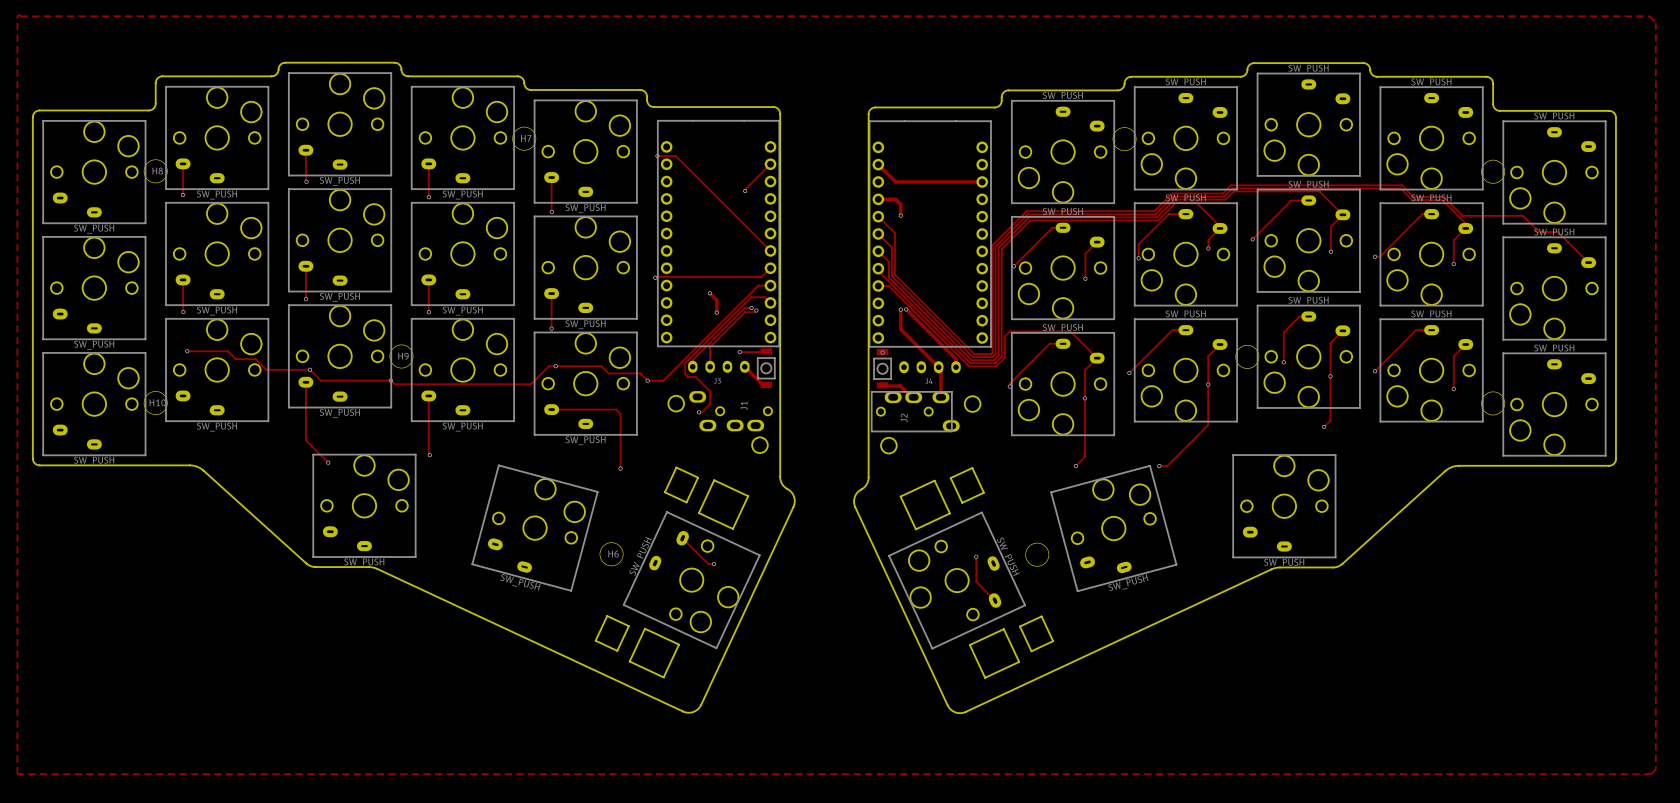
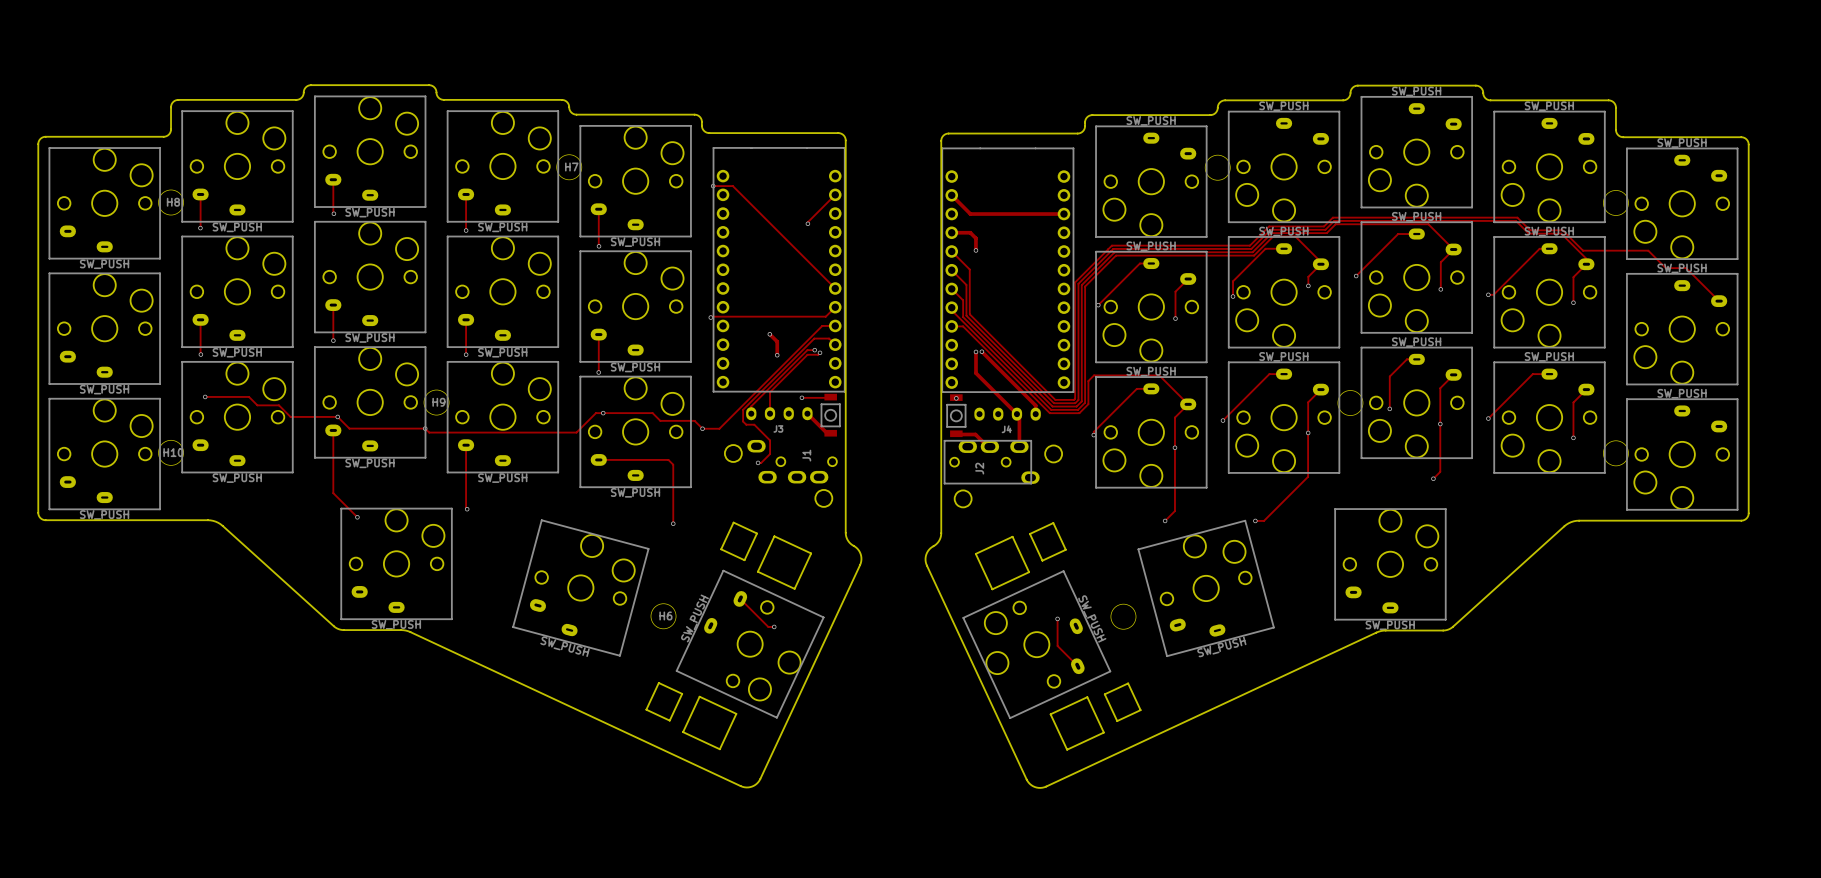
zone outline: (18, 14) (17, 774) (1651, 774) (1655, 769) (1655, 22) (1649, 16) (20, 16) (18, 14) -> none

